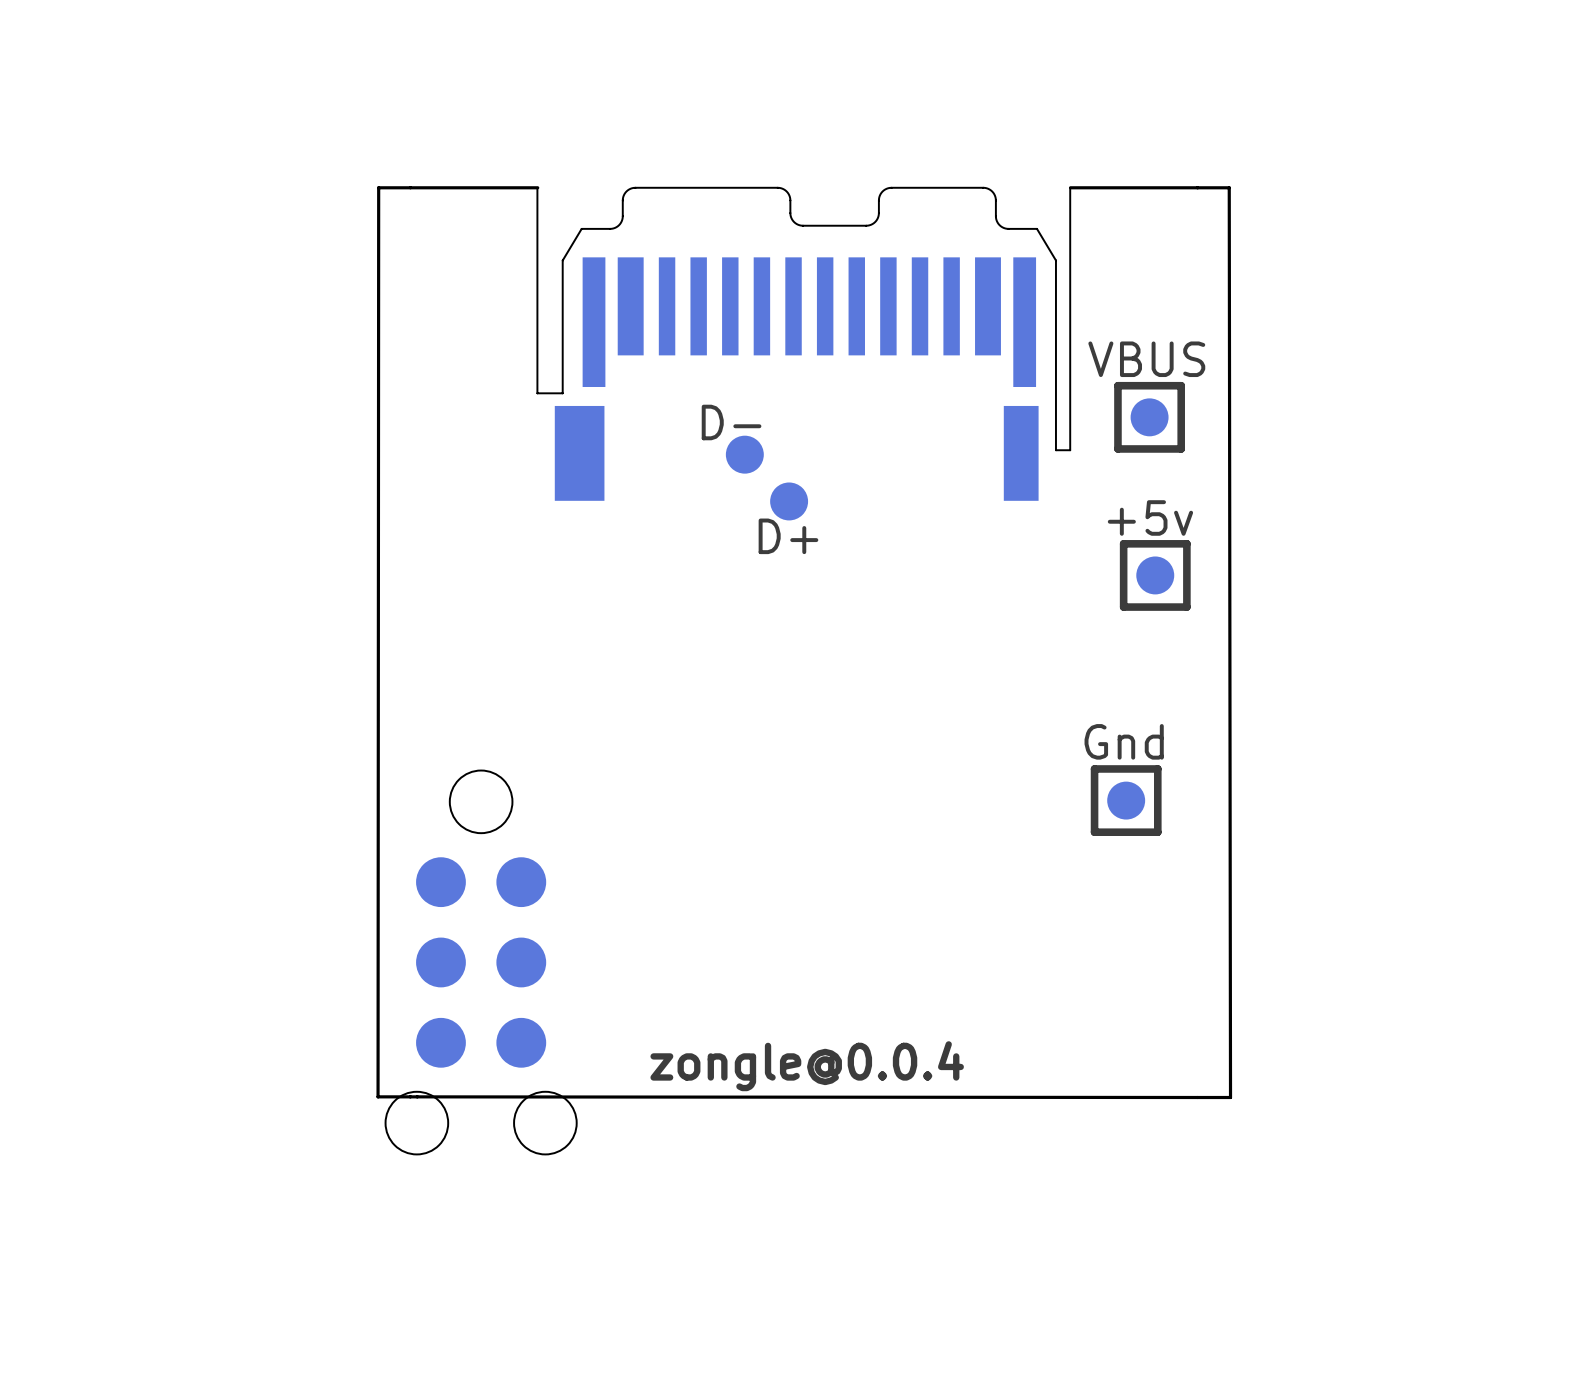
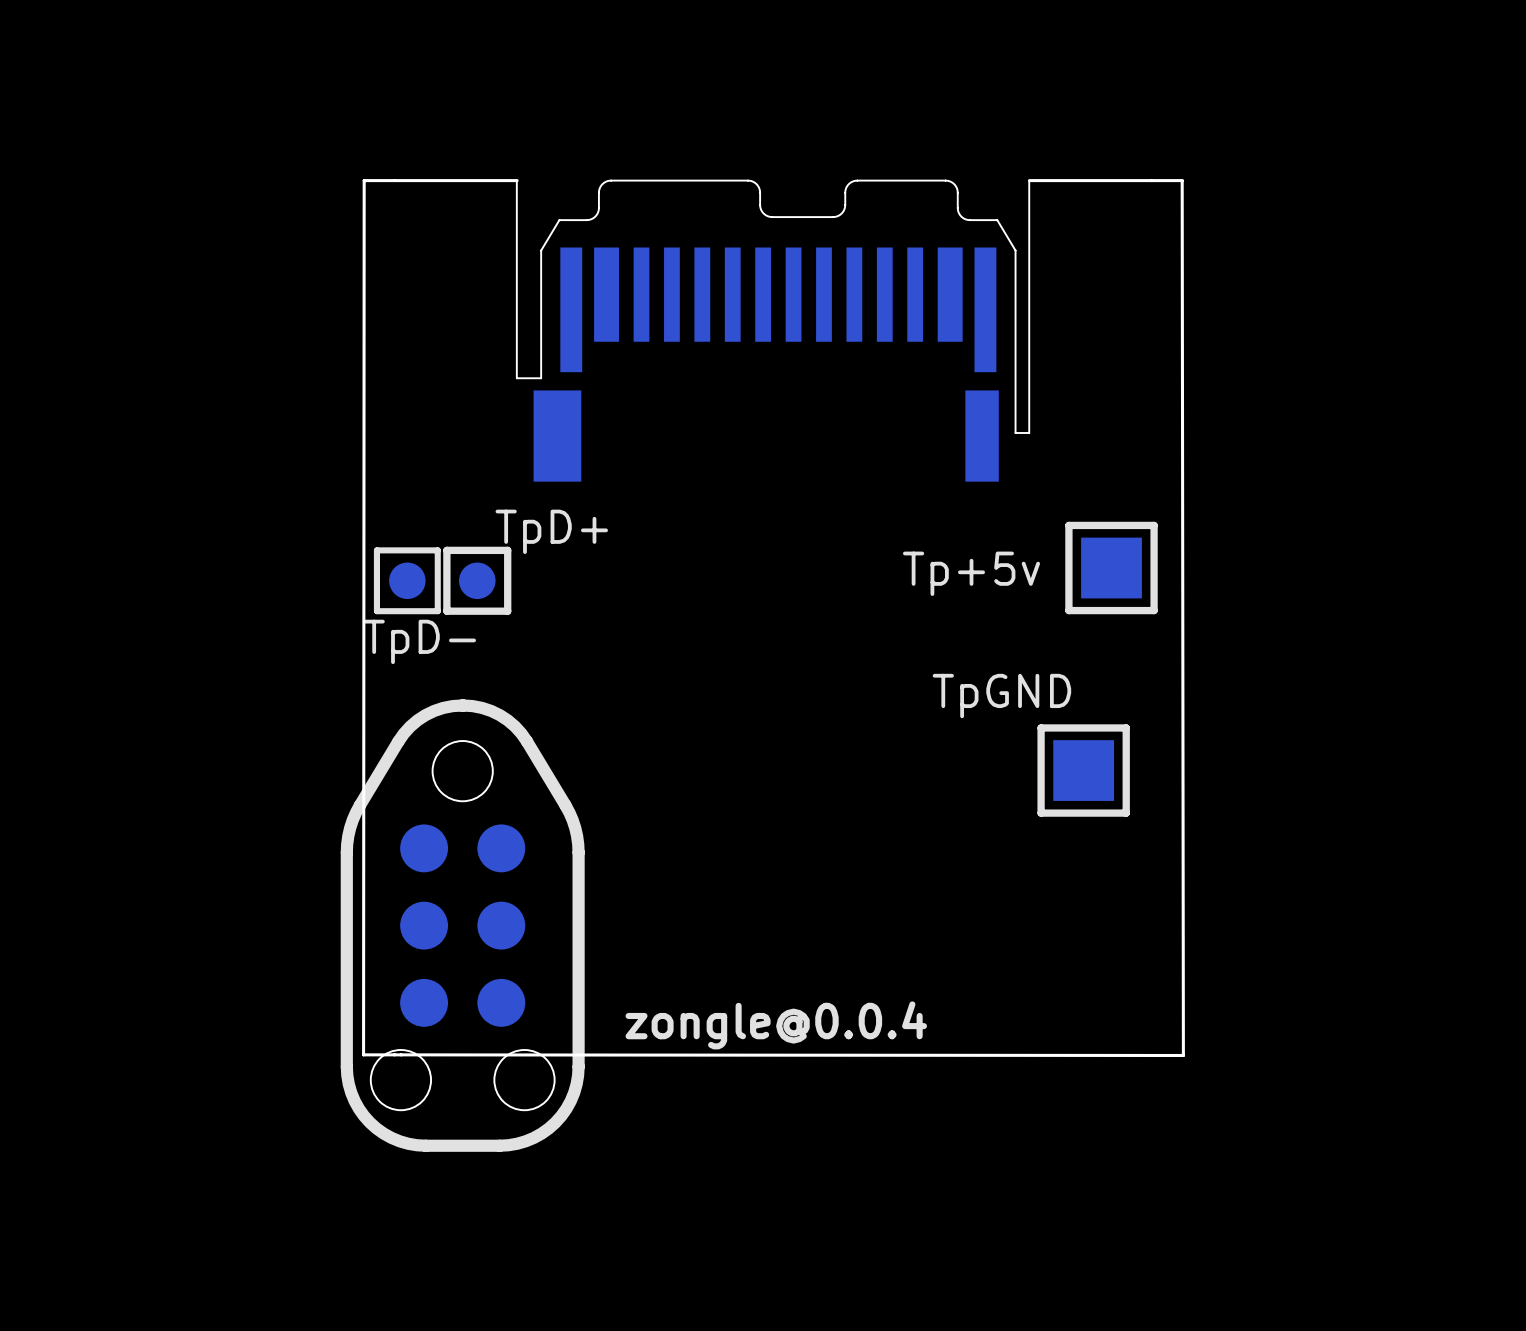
part: VBUS (1149, 417) -> none
part: D- (744, 454) -> none
part: D+ (789, 501) -> none
part: +5v (1155, 575) -> none
Tp+5v: none -> (1111, 568)
TpD-: none -> (407, 580)
TpD+: none -> (477, 580)
part footprint: [385, 770, 577, 1155] -> [340, 699, 585, 1152]
part: Gnd (1126, 800) -> none
TpGND: none -> (1083, 770)

